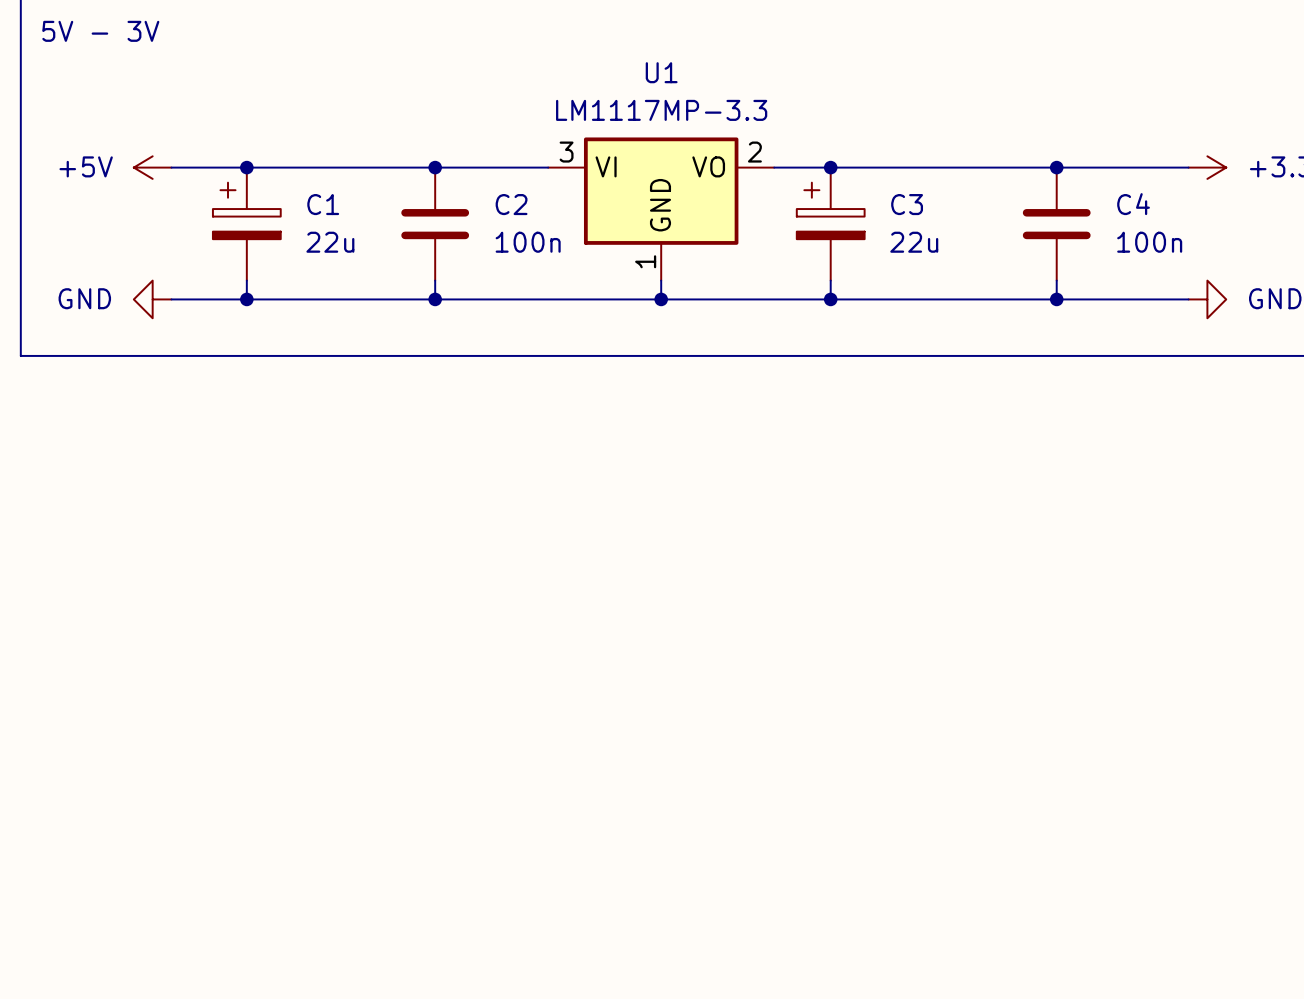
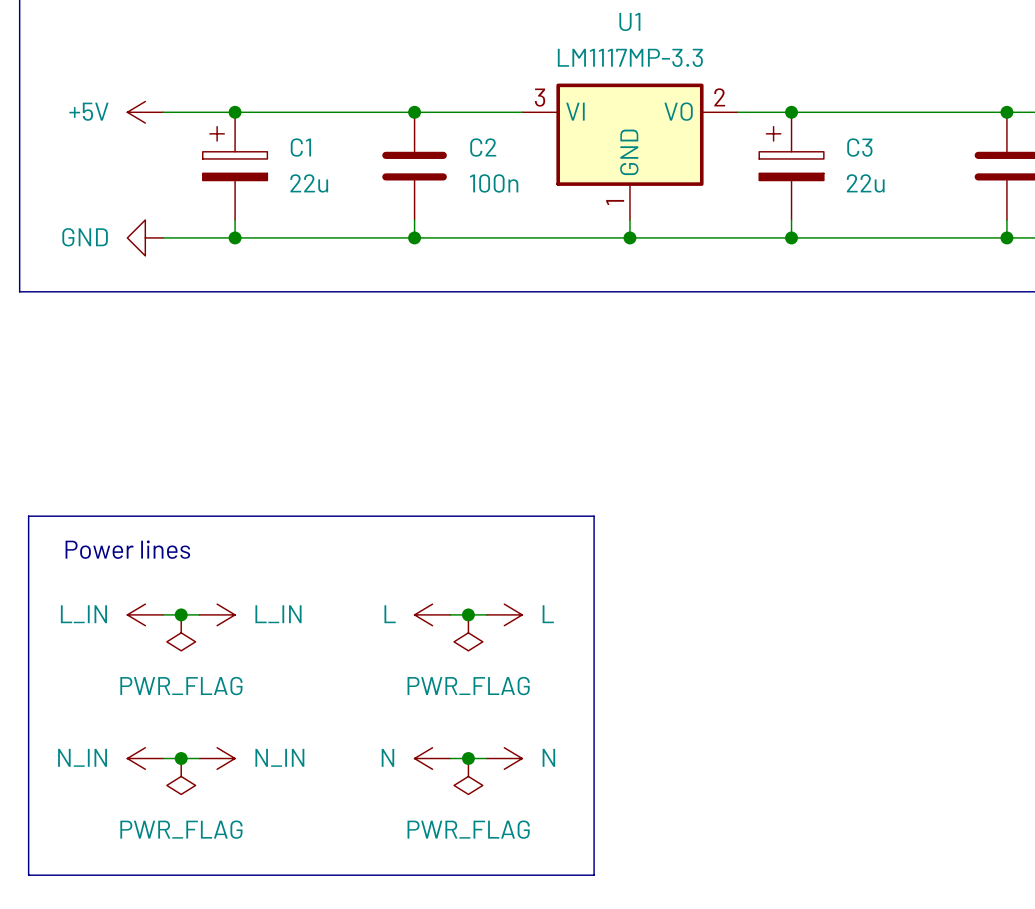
line: none -> (28, 516) (594, 516) (594, 875) (28, 875) (28, 516)
text: none -> Power lines (127, 549)
power symbol: none -> L_IN (145, 614)
wire: none -> (163, 614) (199, 614)
junction: none -> (181, 614)
power symbol: none -> L_IN (217, 614)
power symbol: none -> L (432, 614)
wire: none -> (450, 614) (486, 614)
junction: none -> (468, 614)
power symbol: none -> L (504, 614)
power symbol: none -> PWR_FLAG (181, 632)
power symbol: none -> PWR_FLAG (468, 632)
power symbol: none -> N_IN (145, 758)
wire: none -> (163, 758) (199, 758)
junction: none -> (181, 758)
power symbol: none -> N_IN (217, 758)
power symbol: none -> N (432, 758)
wire: none -> (450, 758) (486, 758)
junction: none -> (468, 758)
power symbol: none -> N (504, 758)
power symbol: none -> PWR_FLAG (181, 776)
power symbol: none -> PWR_FLAG (468, 776)

